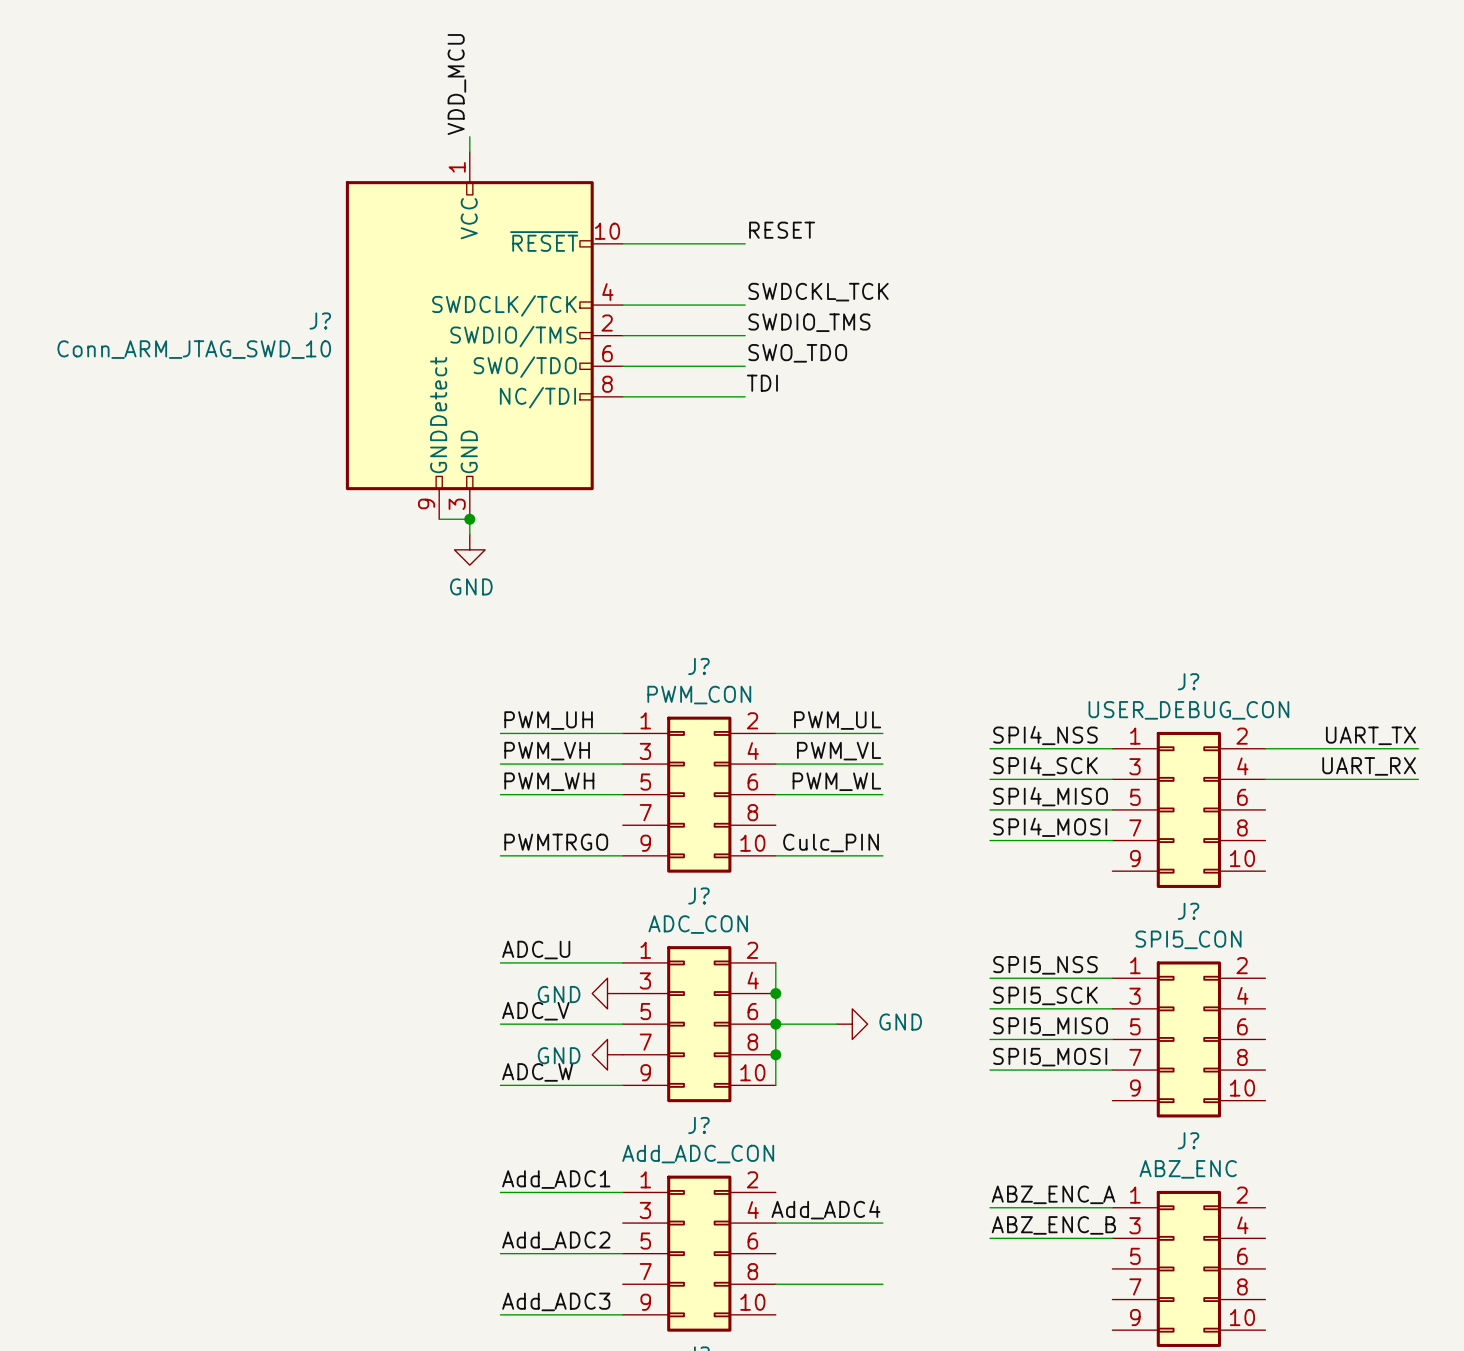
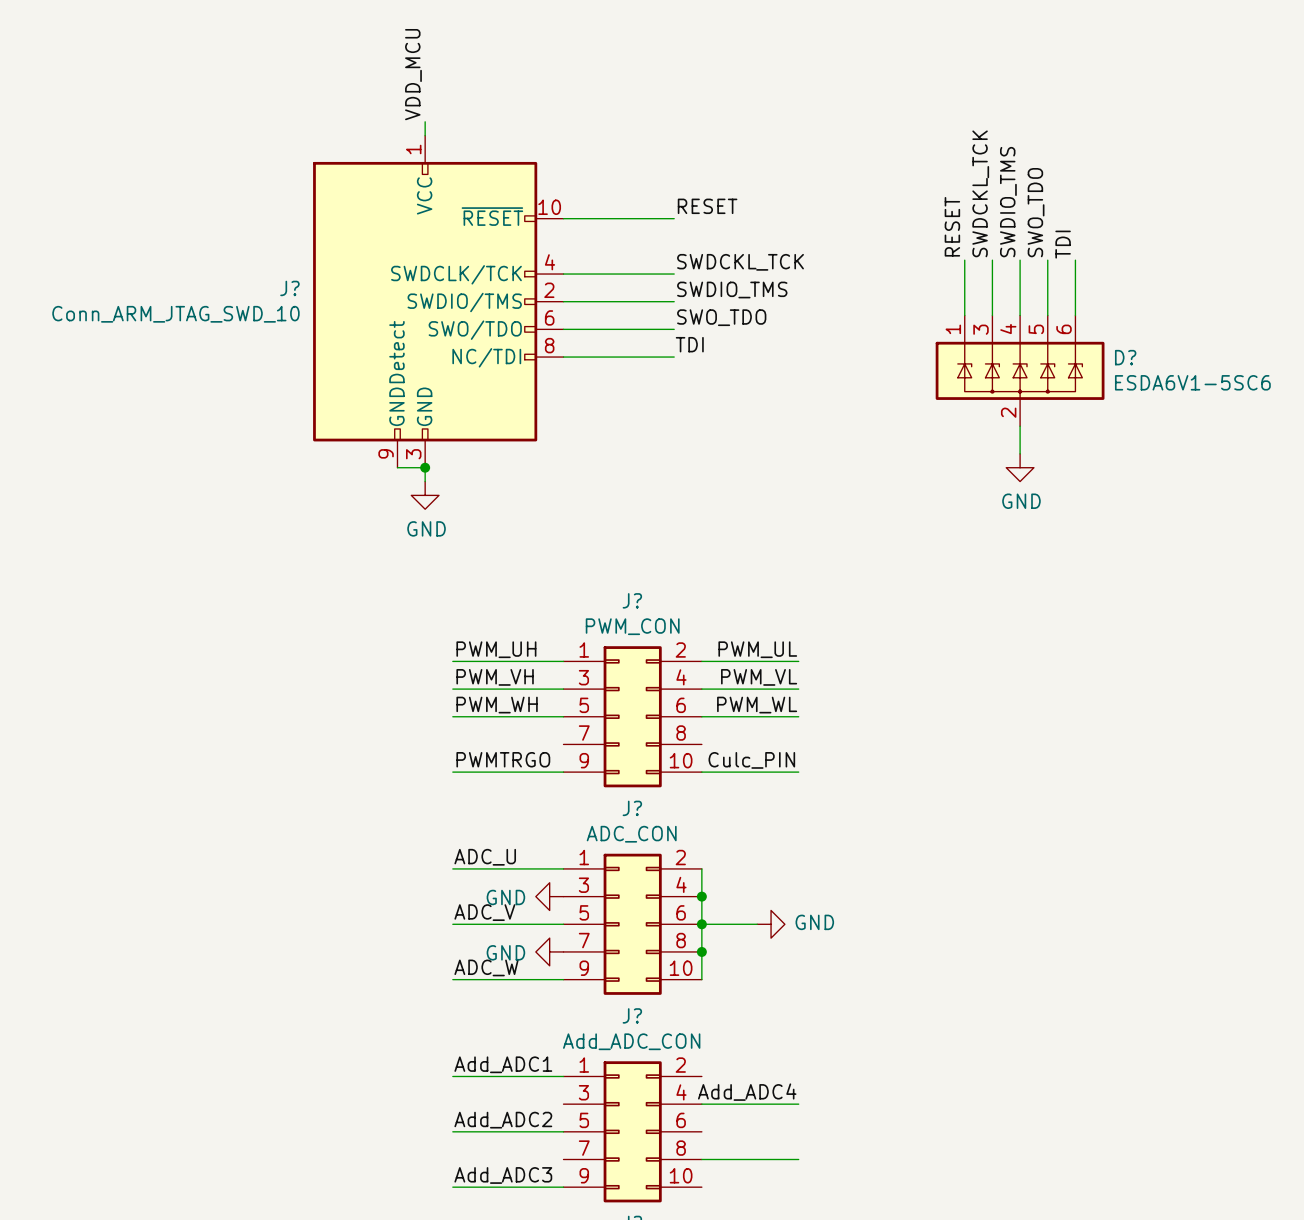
label: none -> SWDCKL_TCK (980, 193)
label: none -> SWDIO_TMS (1008, 202)
label: none -> SWO_TDO (1036, 212)
label: none -> RESET (952, 226)
label: none -> TDI (1063, 244)
wire: none -> (964, 260) (964, 315)
wire: none -> (992, 260) (992, 315)
wire: none -> (1020, 260) (1020, 315)
wire: none -> (1047, 260) (1047, 315)
wire: none -> (1075, 260) (1075, 315)
D?: none -> ESDA6V1-5SC6 (1020, 370)
wire: none -> (1020, 426) (1020, 453)
power symbol: none -> GND (1020, 467)
label: SPI4_NSS (1045, 735) -> none
label: UART_TX (1370, 735) -> none
wire: (990, 748) (1112, 748) -> none
wire: (1265, 748) (1418, 748) -> none
label: SPI4_SCK (1045, 766) -> none
label: UART_RX (1369, 766) -> none
wire: (990, 779) (1112, 779) -> none
wire: (1265, 779) (1418, 779) -> none
label: SPI4_MISO (1050, 796) -> none
wire: (990, 809) (1112, 809) -> none
J?: USER_DEBUG_CON (1188, 809) -> none
label: SPI4_MOSI (1050, 827) -> none
wire: (990, 840) (1112, 840) -> none
label: SPI5_NSS (1045, 965) -> none
wire: (990, 978) (1112, 978) -> none
label: SPI5_SCK (1045, 995) -> none
wire: (990, 1008) (1112, 1008) -> none
label: SPI5_MISO (1050, 1026) -> none
wire: (990, 1039) (1112, 1039) -> none
J?: SPI5_CON (1188, 1039) -> none
label: SPI5_MOSI (1050, 1057) -> none
wire: (990, 1070) (1112, 1070) -> none
label: ABZ_ENC_A (1053, 1194) -> none
wire: (990, 1207) (1112, 1207) -> none
label: ABZ_ENC_B (1053, 1225) -> none
wire: (990, 1238) (1112, 1238) -> none
J?: ABZ_ENC (1188, 1268) -> none

